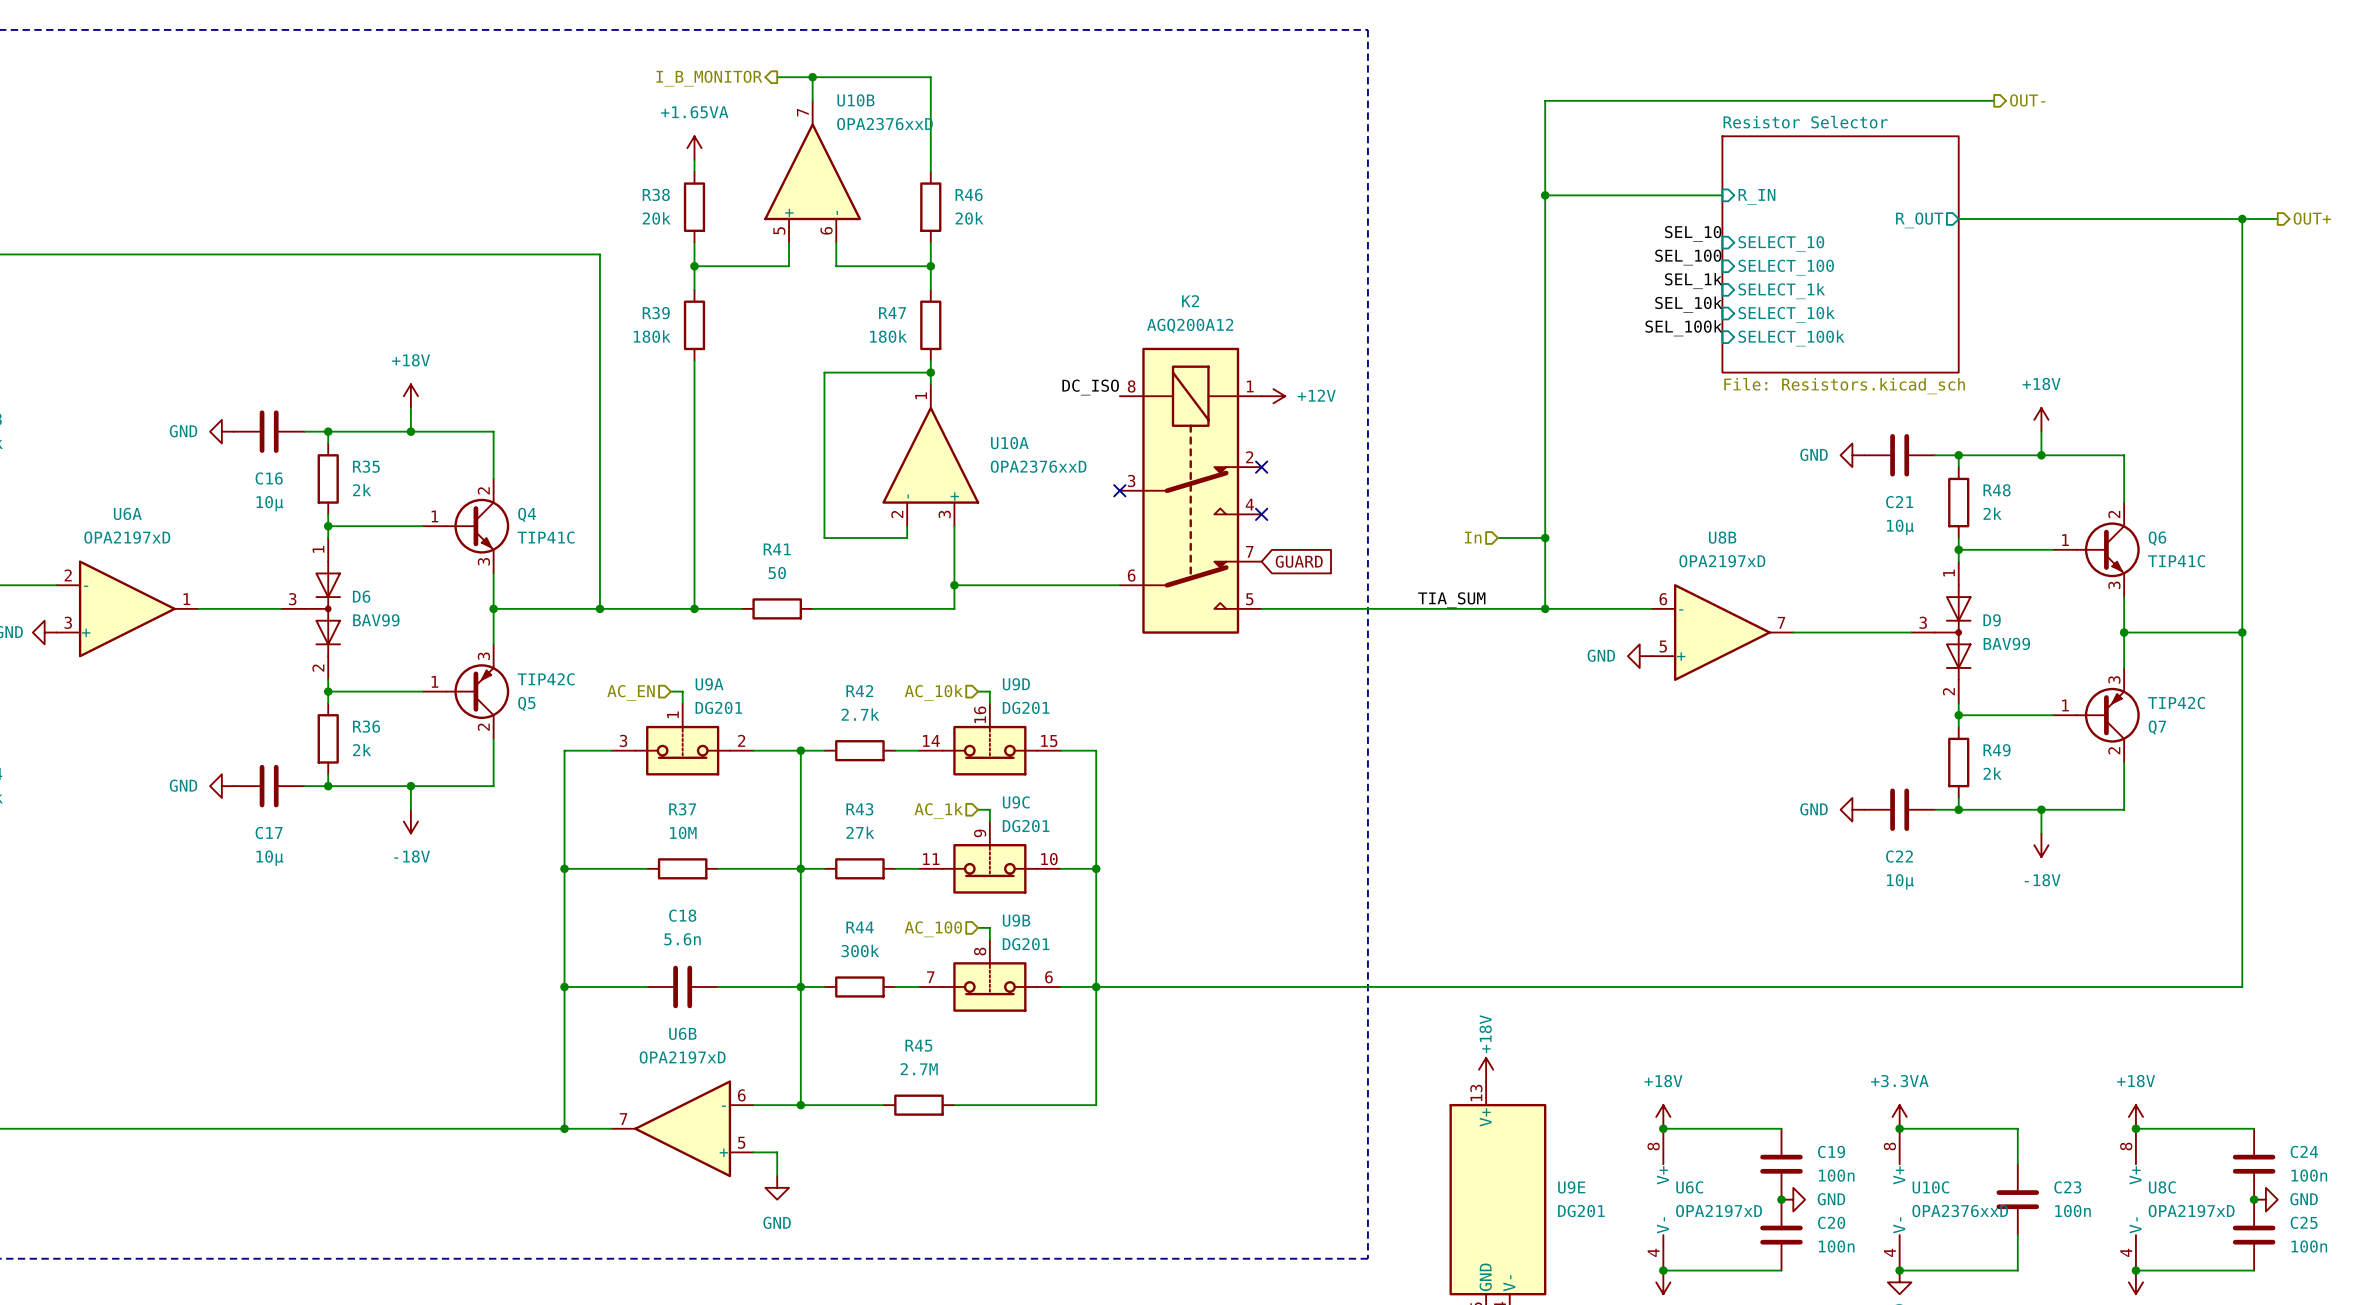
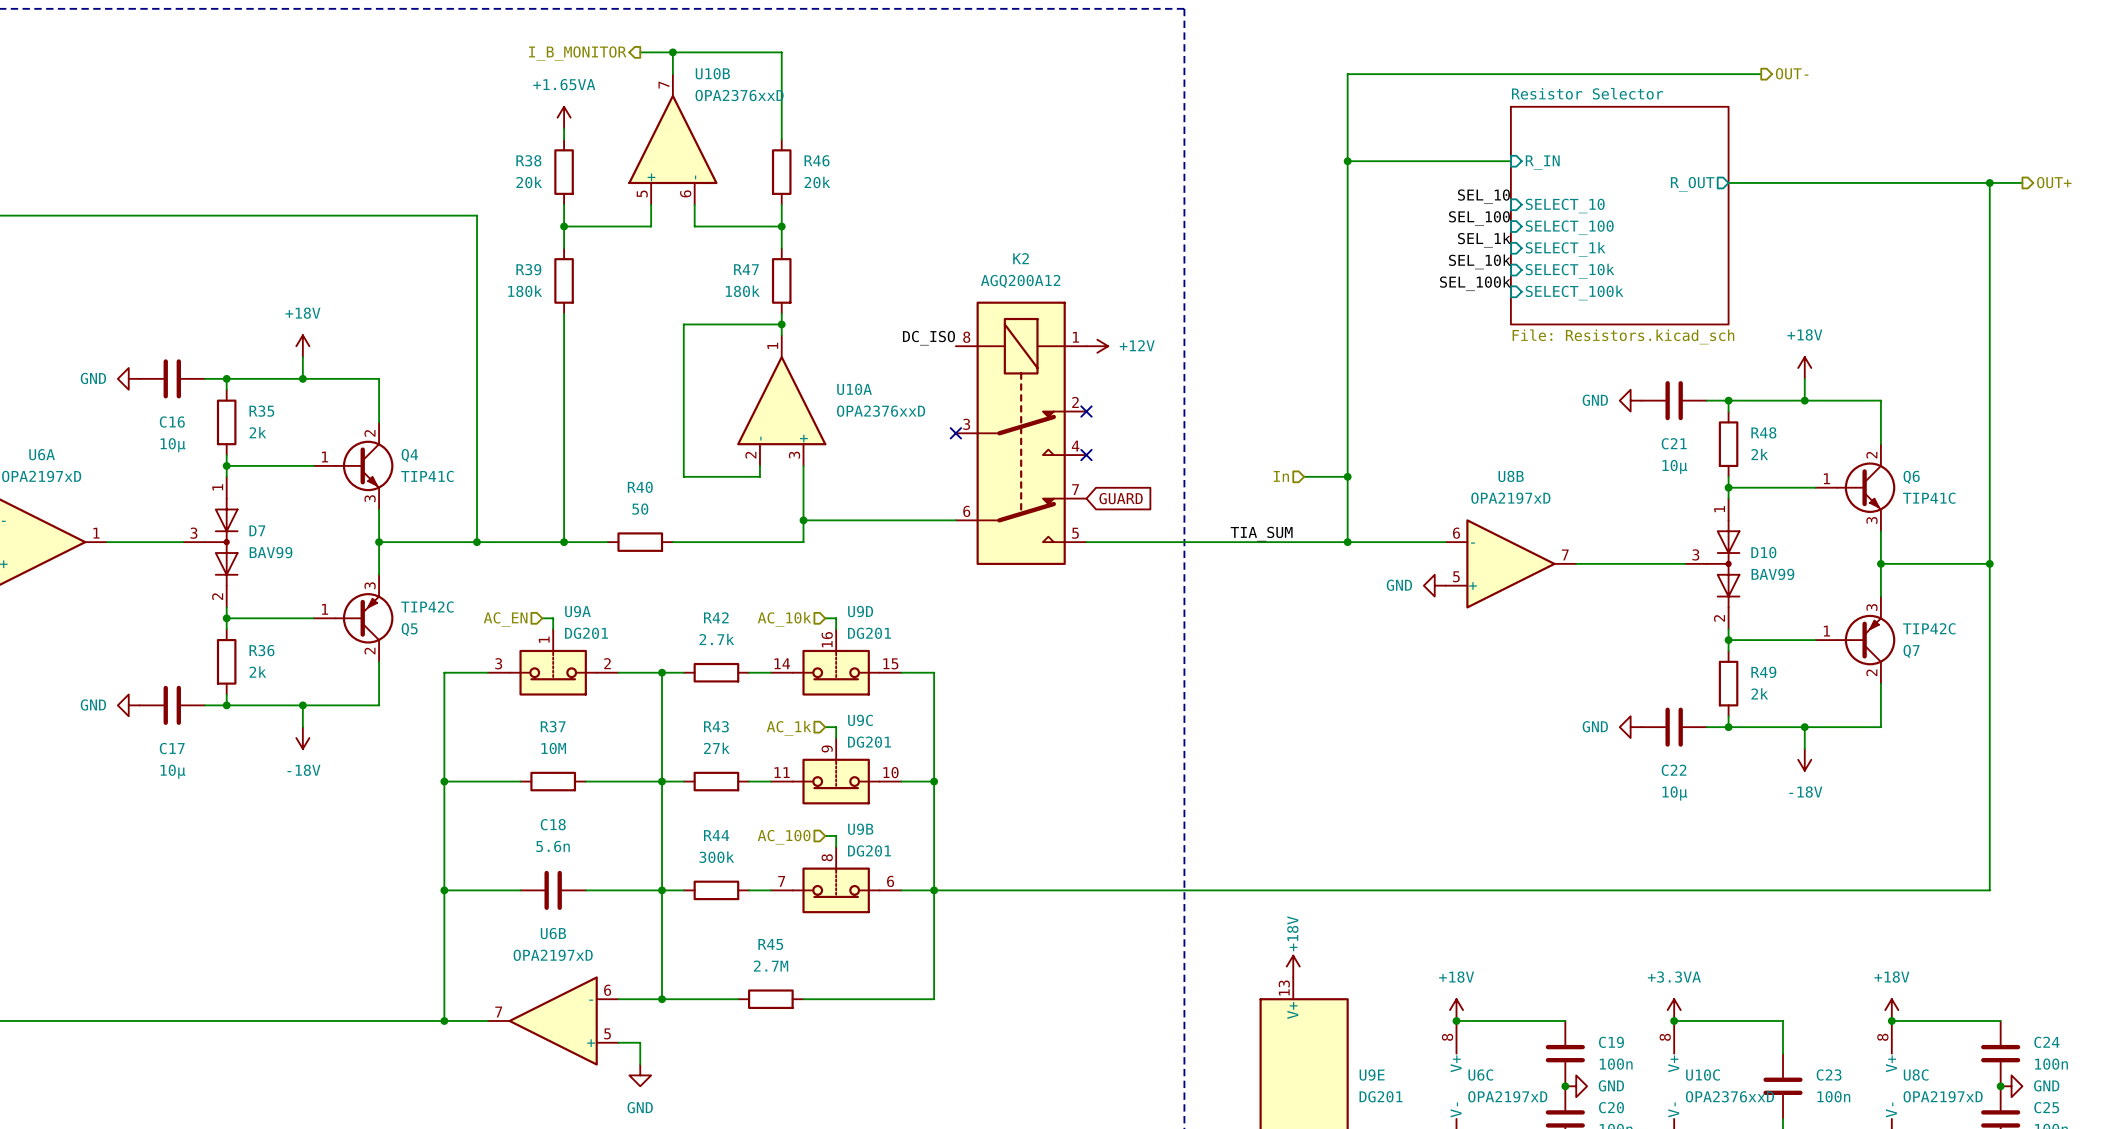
R41 name: R41 (777, 549) -> R40 (640, 487)
D6 name: D6 (361, 596) -> D7 (257, 530)
D9 name: D9 (1992, 620) -> D10 (1763, 552)

